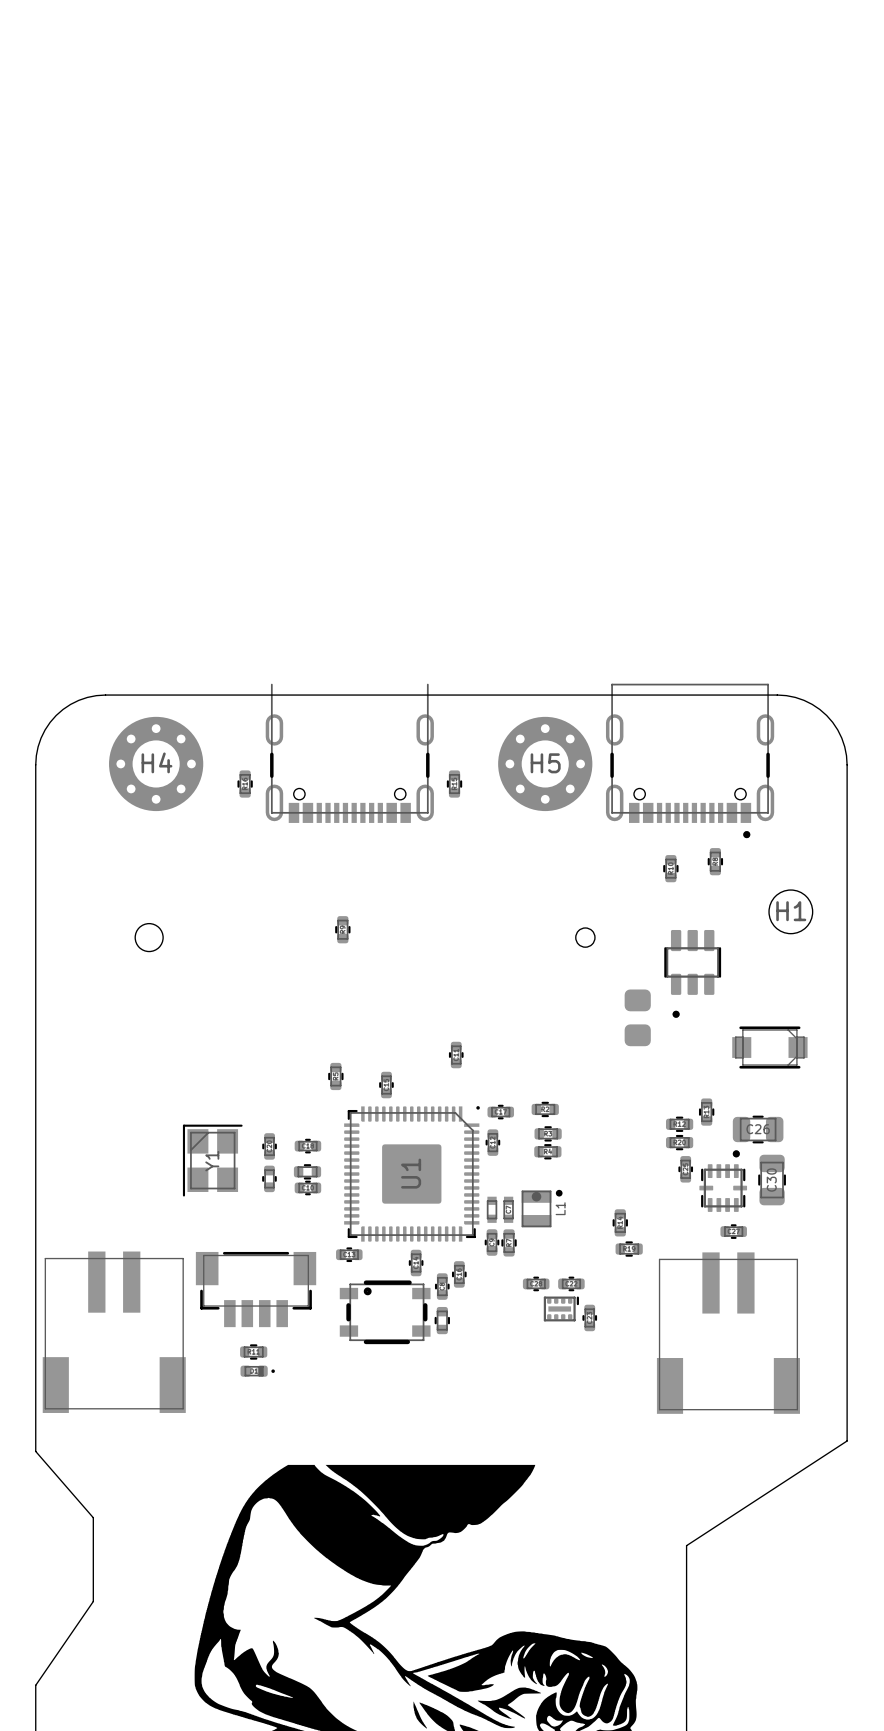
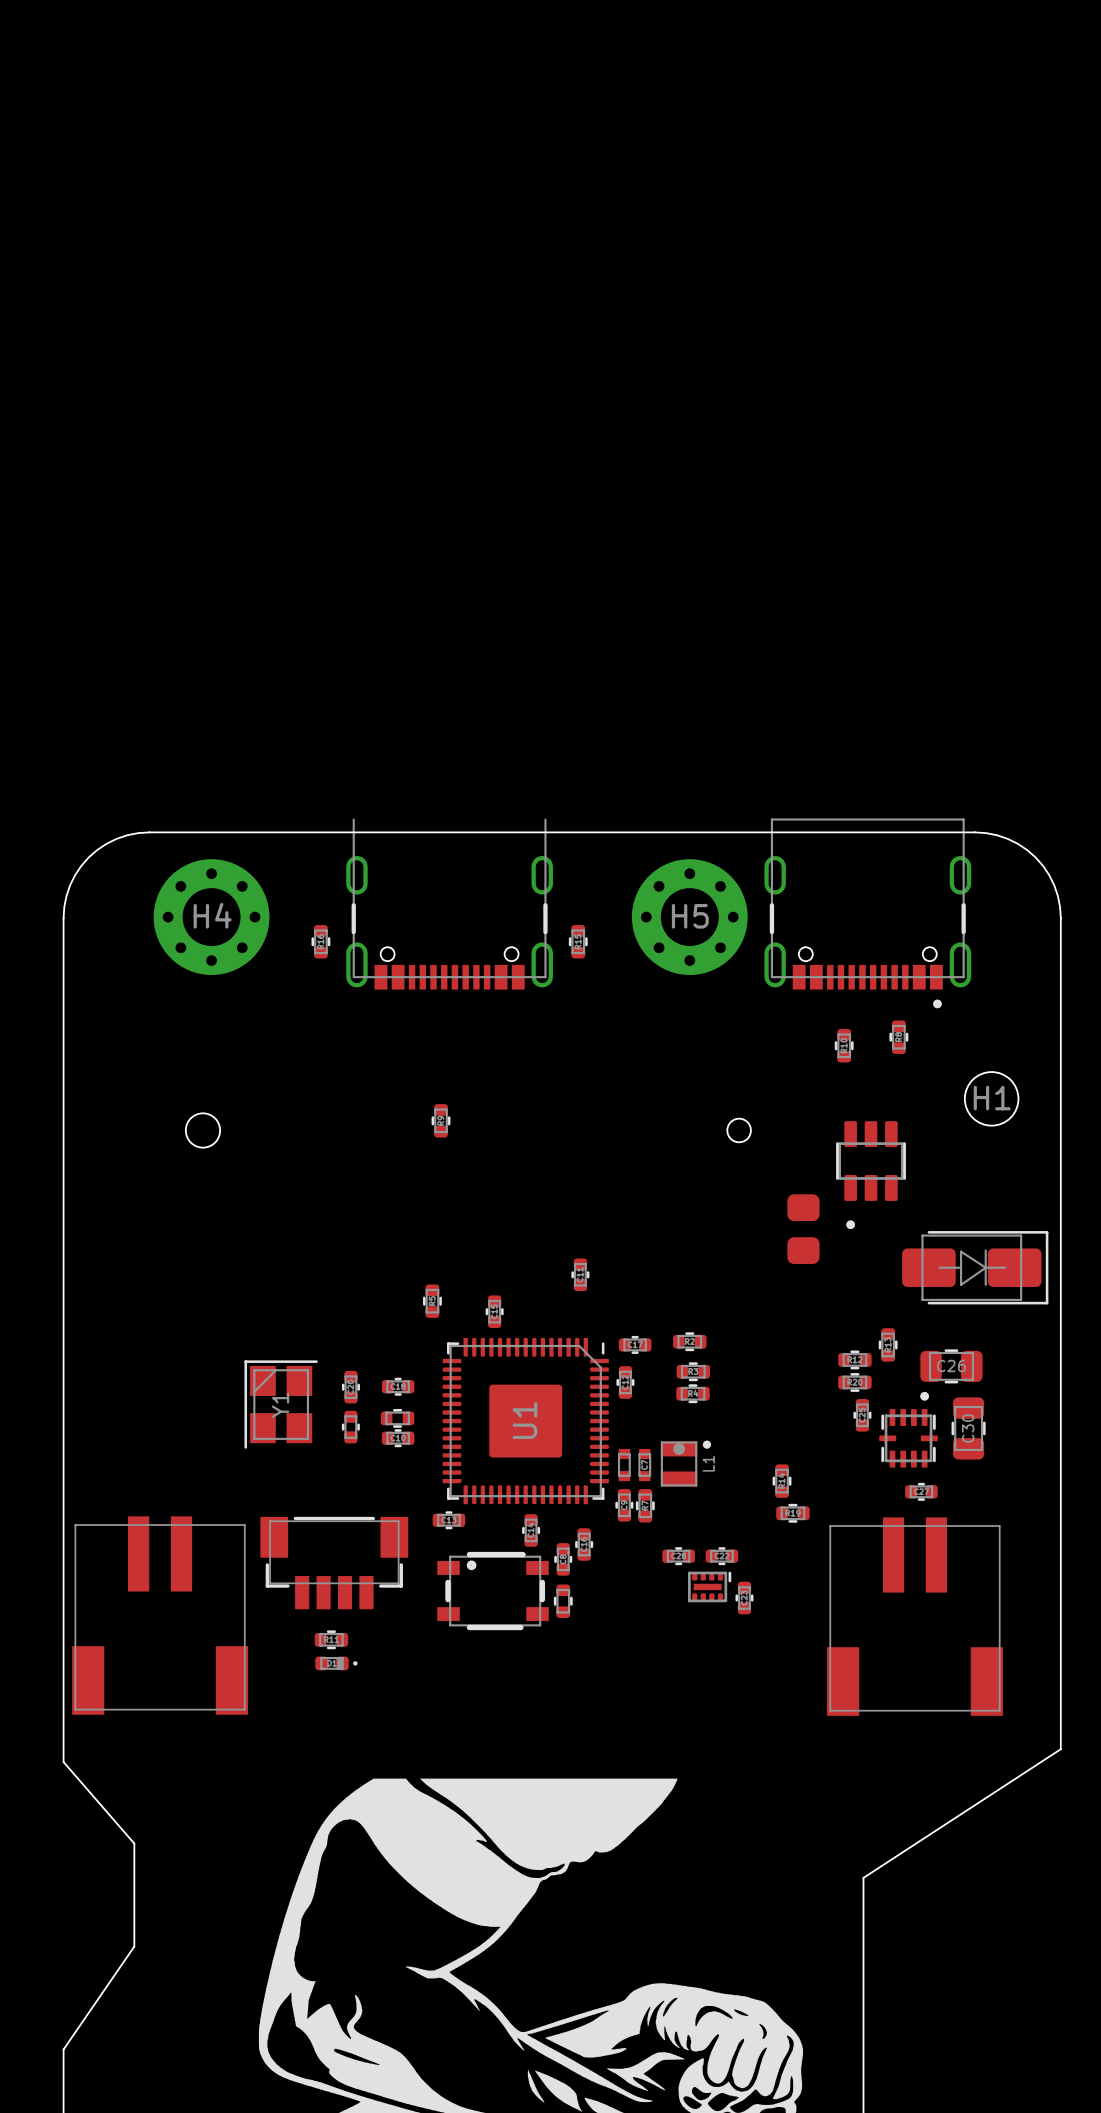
part footprint: [732, 1026, 808, 1069] -> [902, 1231, 1049, 1305]
U1 footprint: [344, 1106, 480, 1242] -> [442, 1337, 609, 1505]

